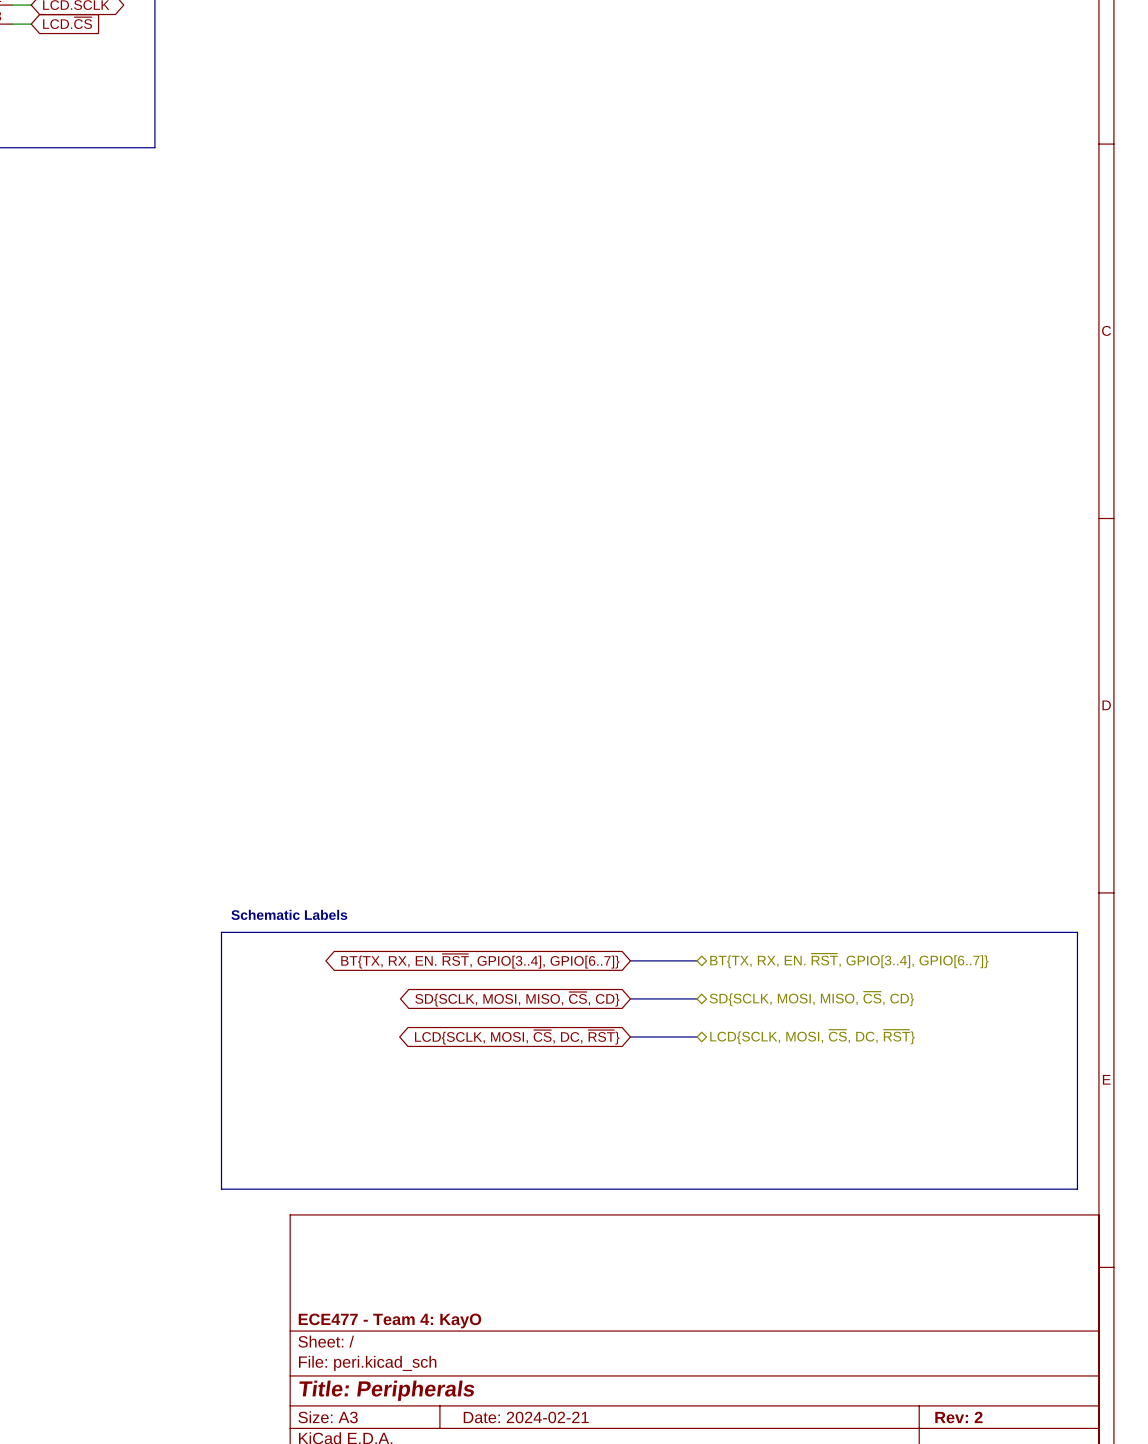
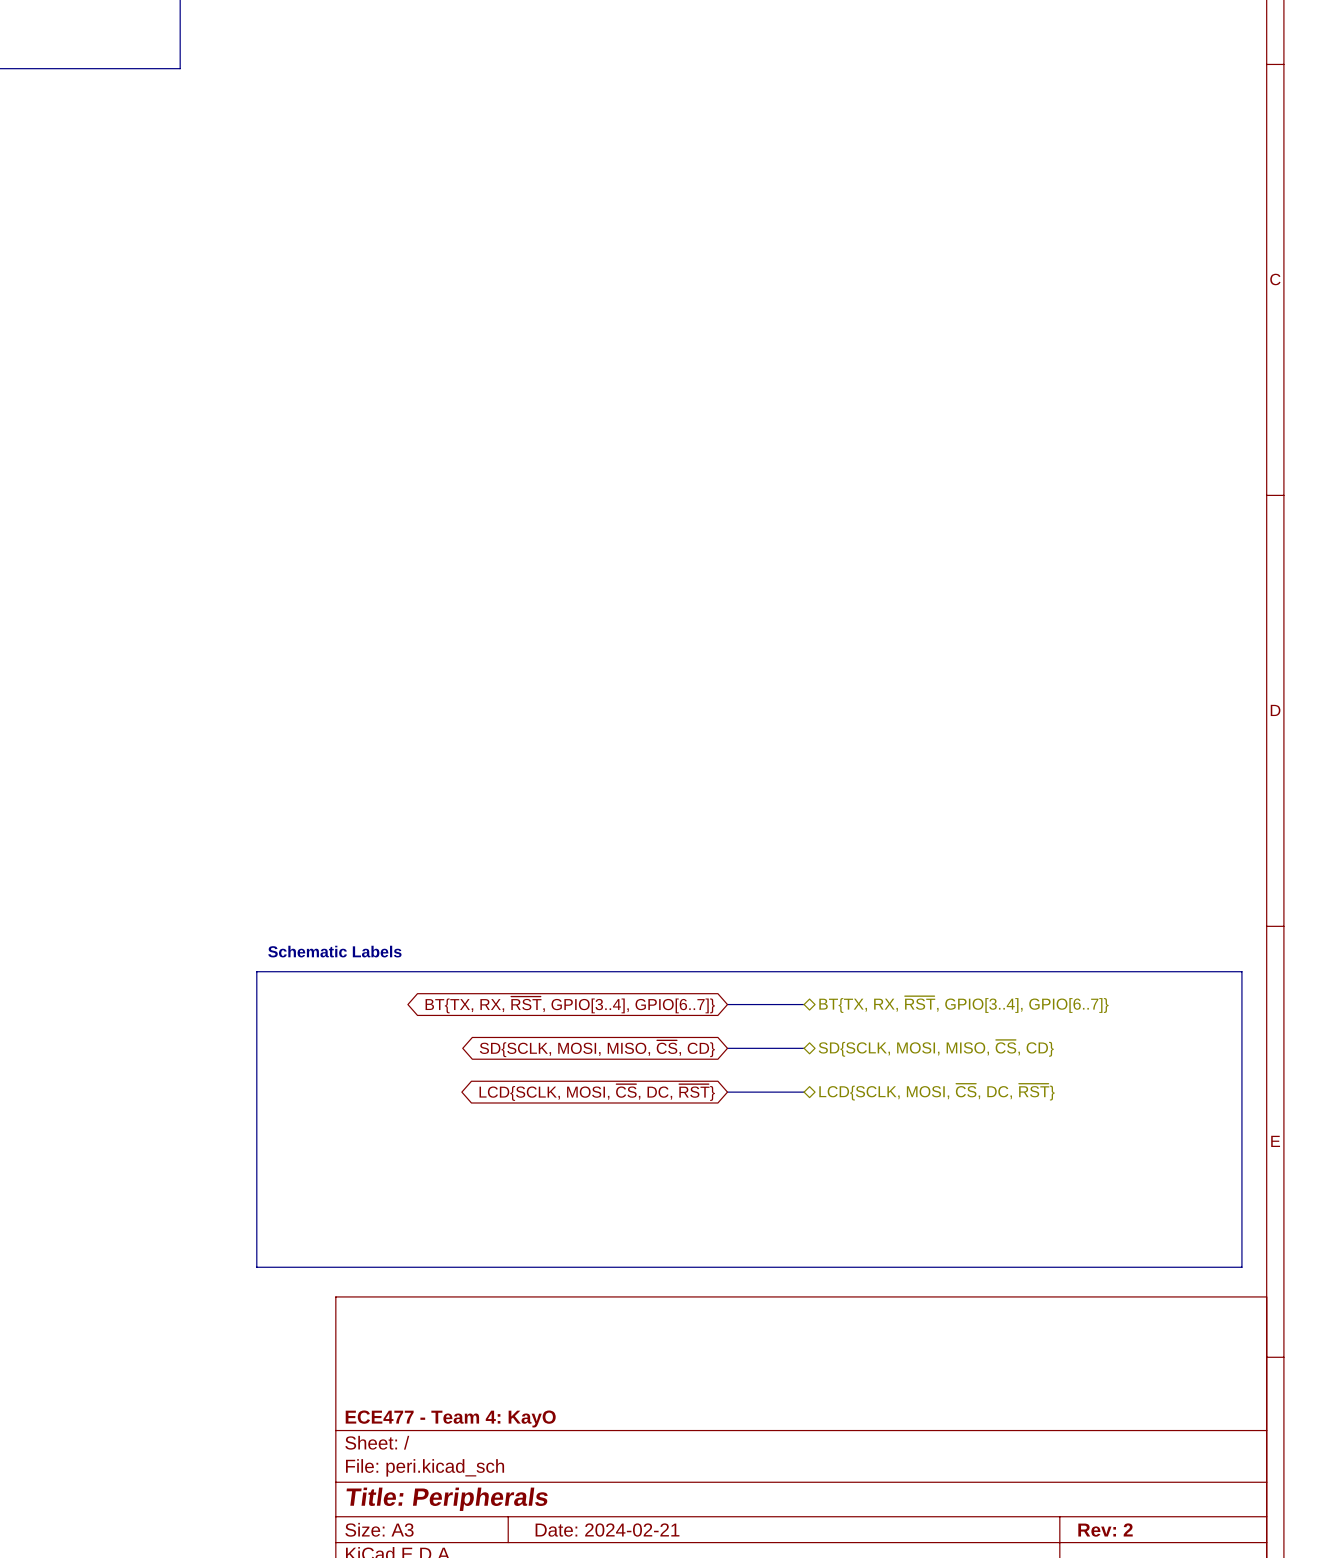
hierarchical label: BT{TX, RX, EN. ~{RST}, GPIO[3..4], GPIO[6..7]} (849, 960) -> BT{TX, RX, ~{RST}, GPIO[3..4], GPIO[6..7]} (963, 1004)
global label: BT{TX, RX, EN. ~{RST}, GPIO[3..4], GPIO[6..7]} (480, 961) -> BT{TX, RX, ~{RST}, GPIO[3..4], GPIO[6..7]} (570, 1004)

